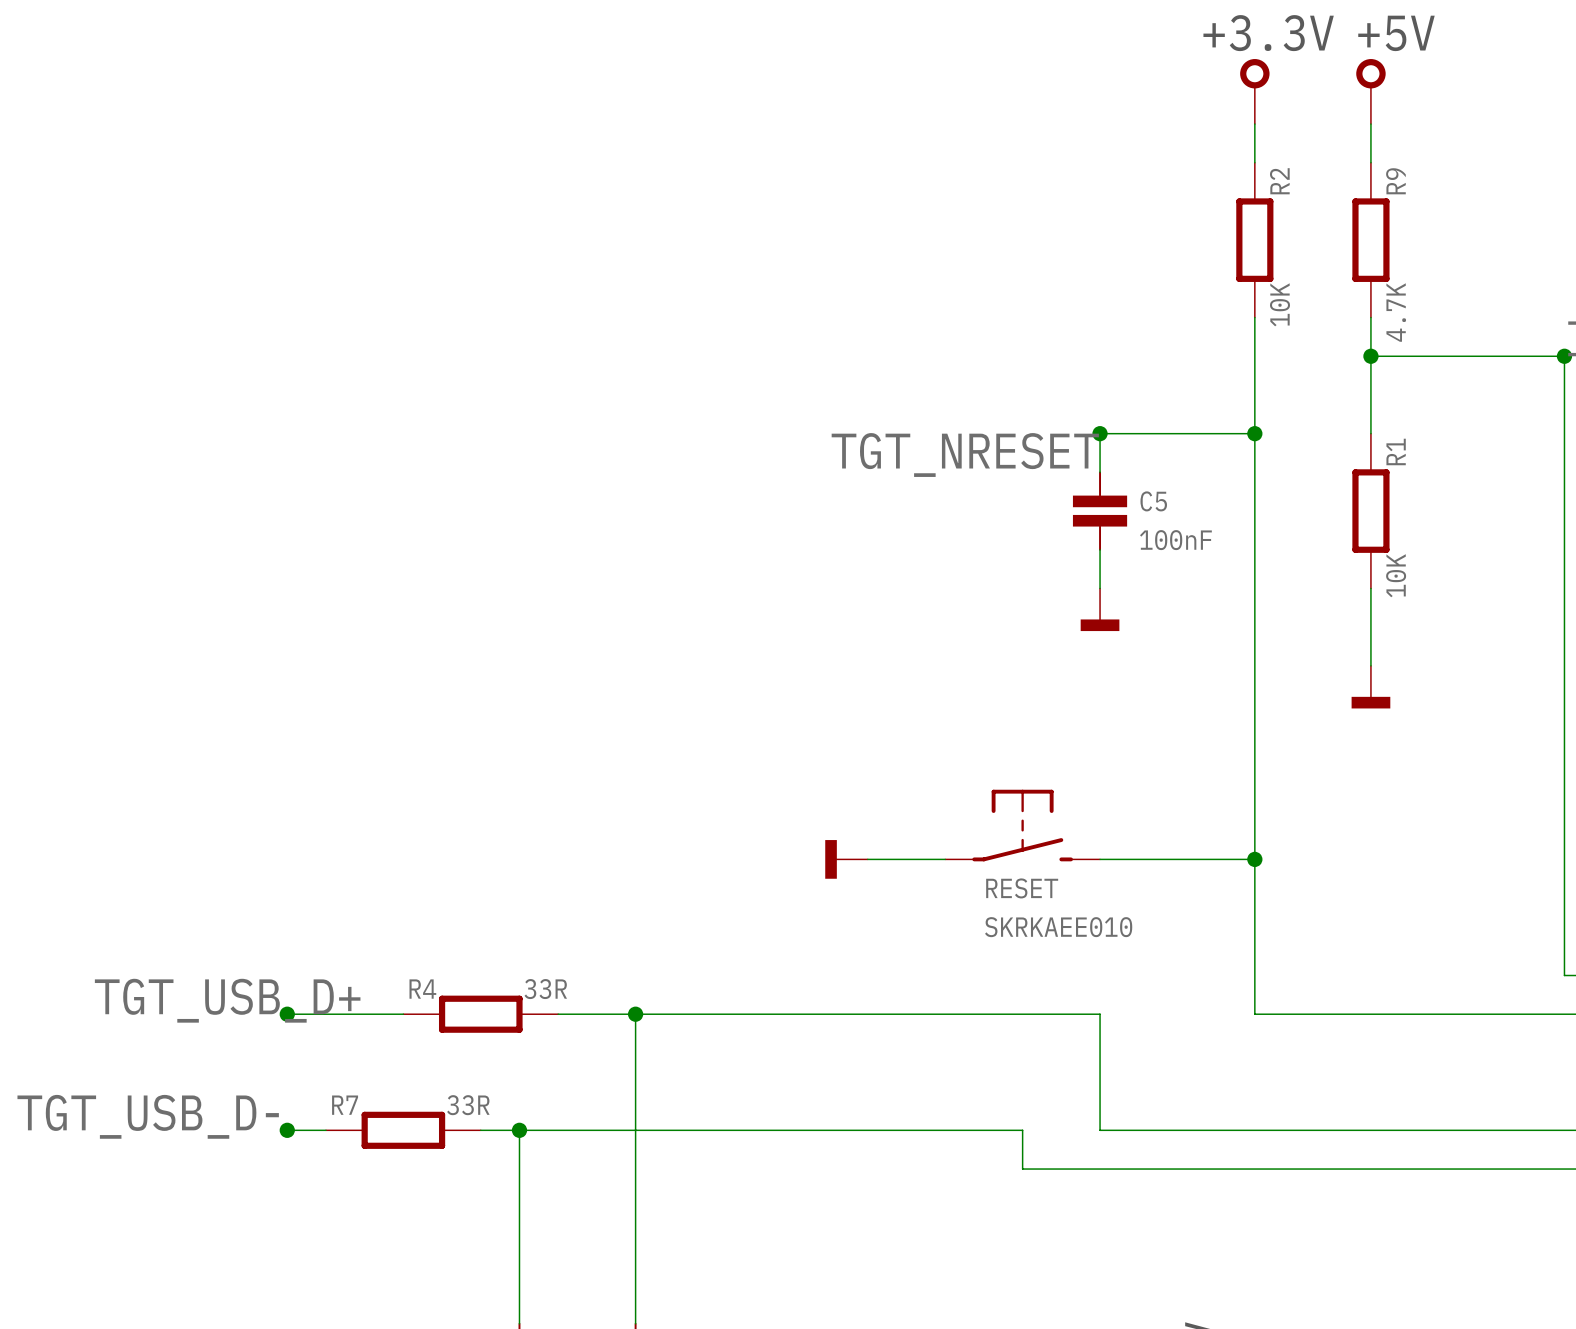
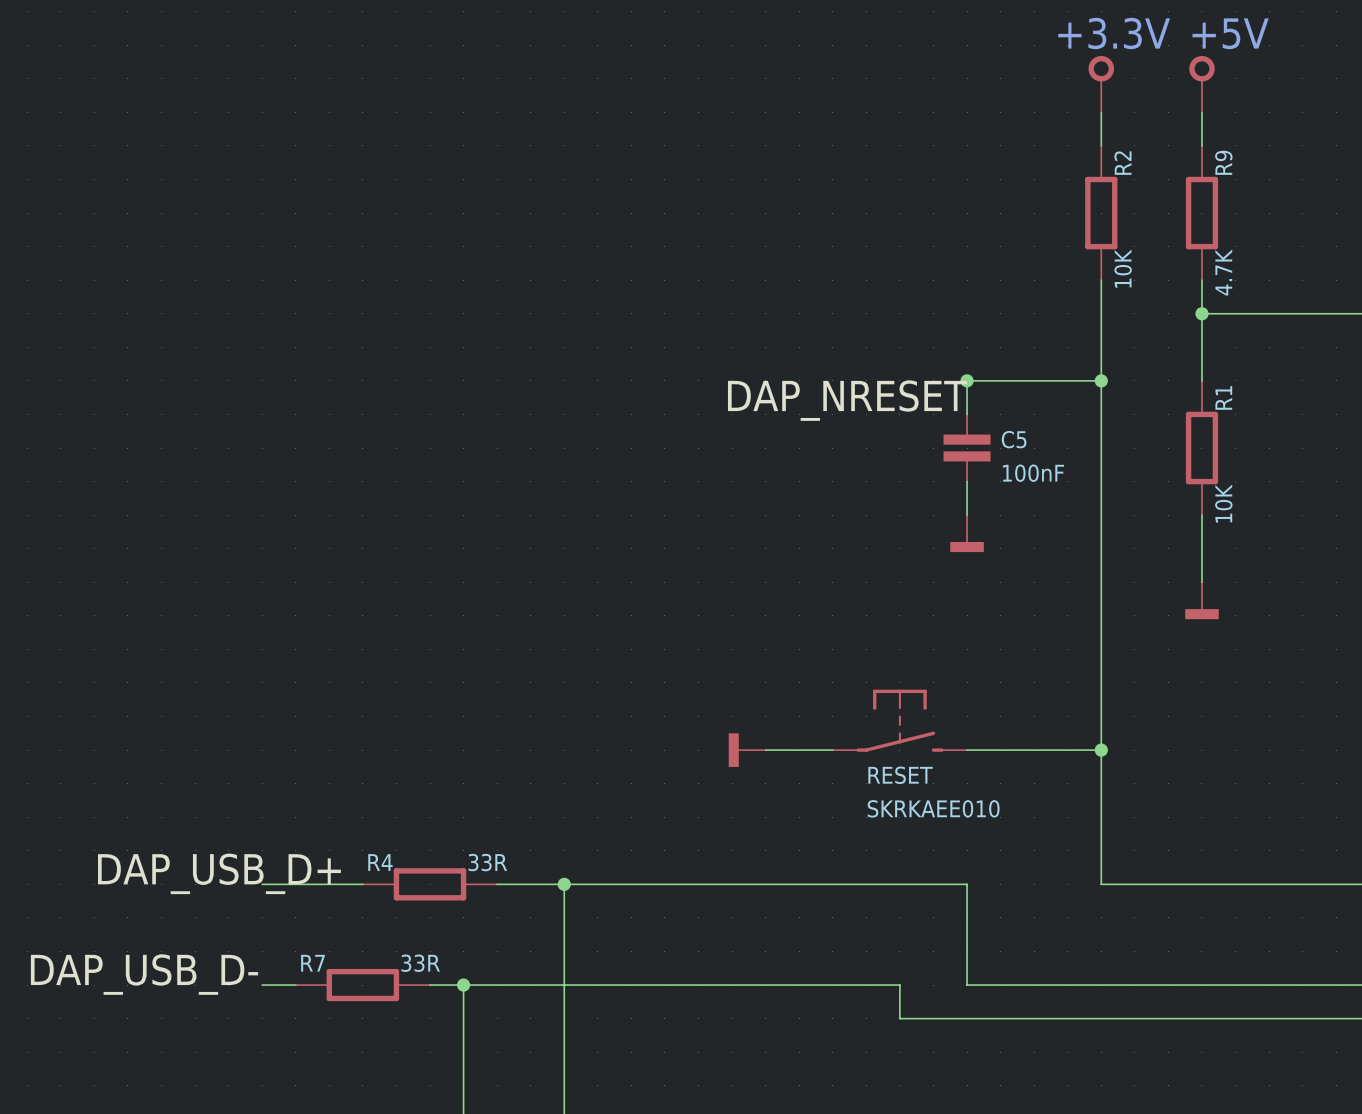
label: TGT_NRESET (965, 455) -> DAP_NRESET (847, 400)
label: TGT_USB_D+ (227, 1000) -> DAP_USB_D+ (219, 873)
junction: (287, 1014) -> none
label: TGT_USB_D- (148, 1116) -> DAP_USB_D- (144, 974)
junction: (287, 1130) -> none

